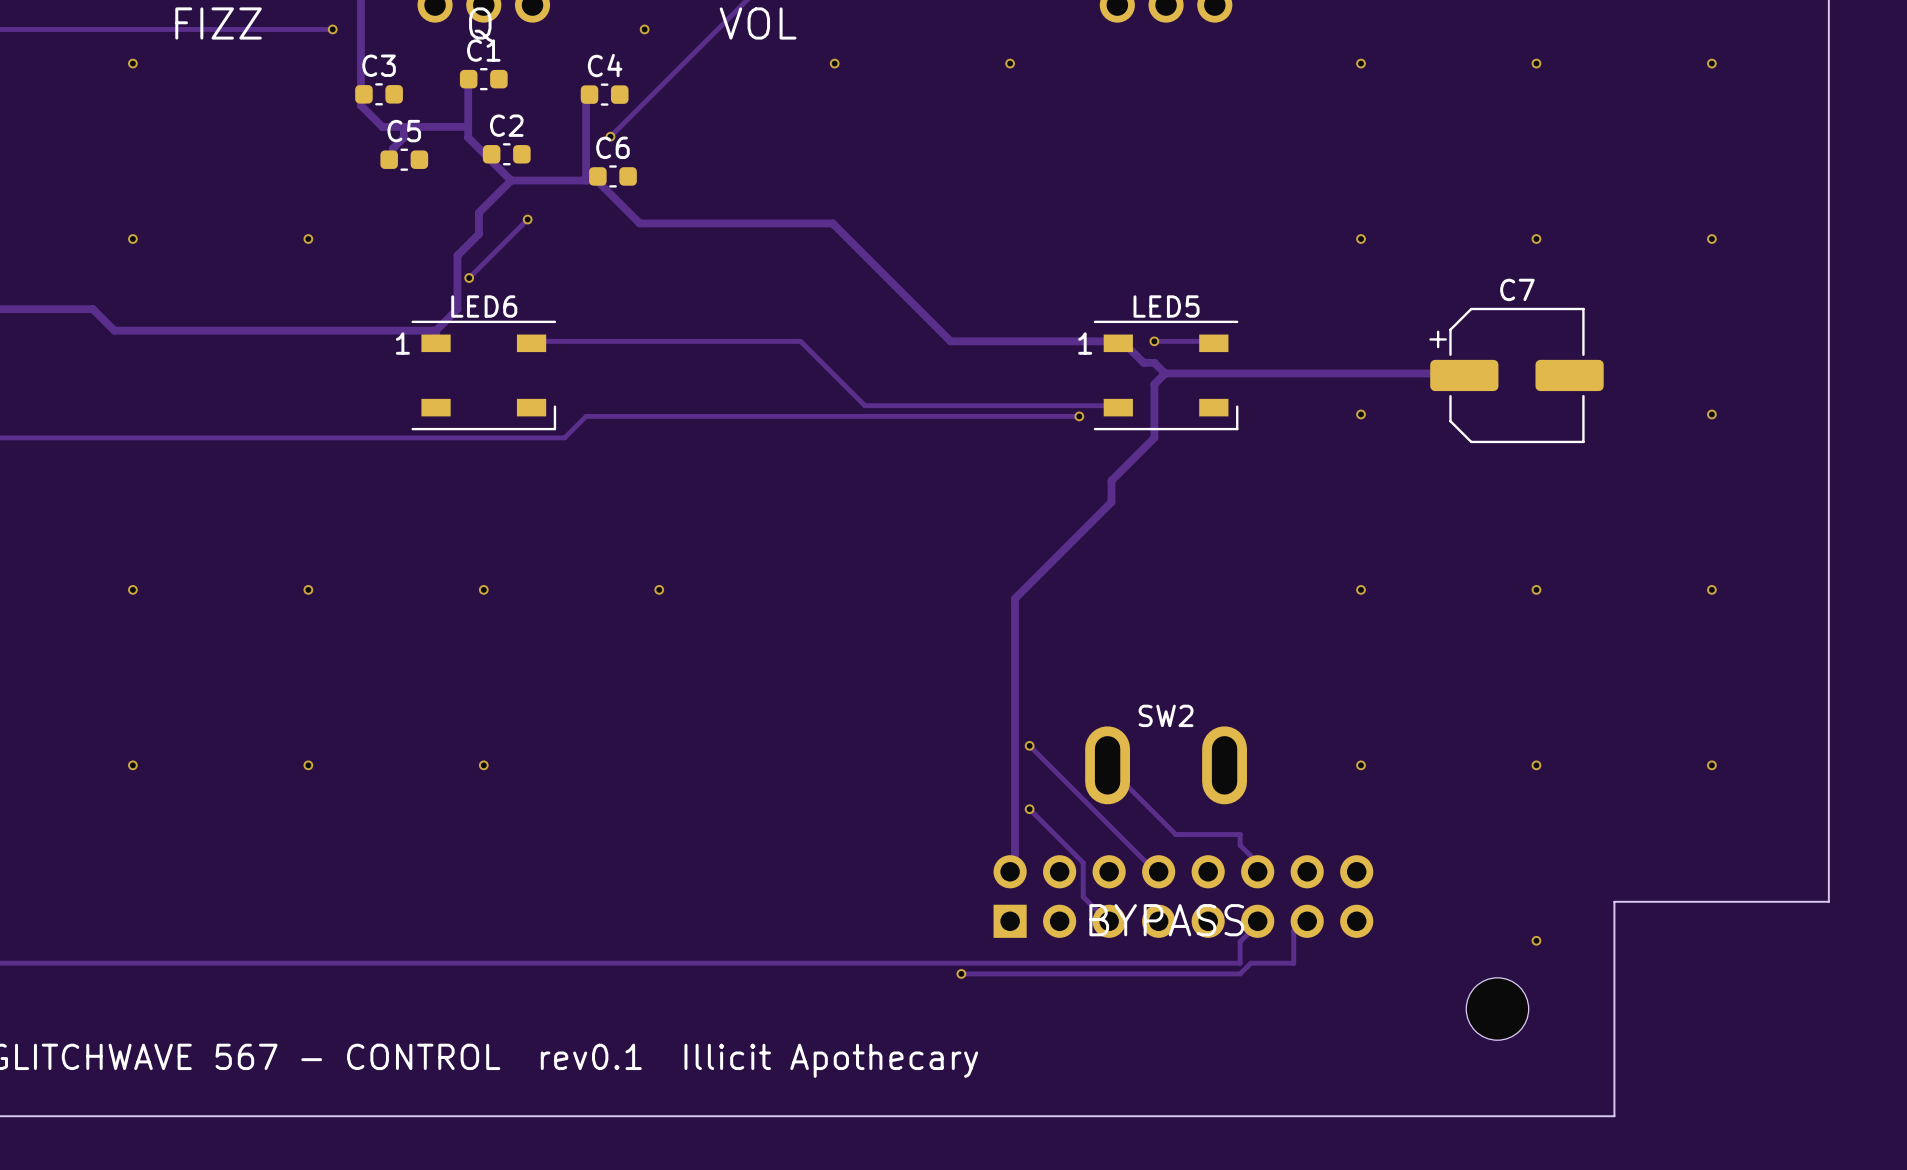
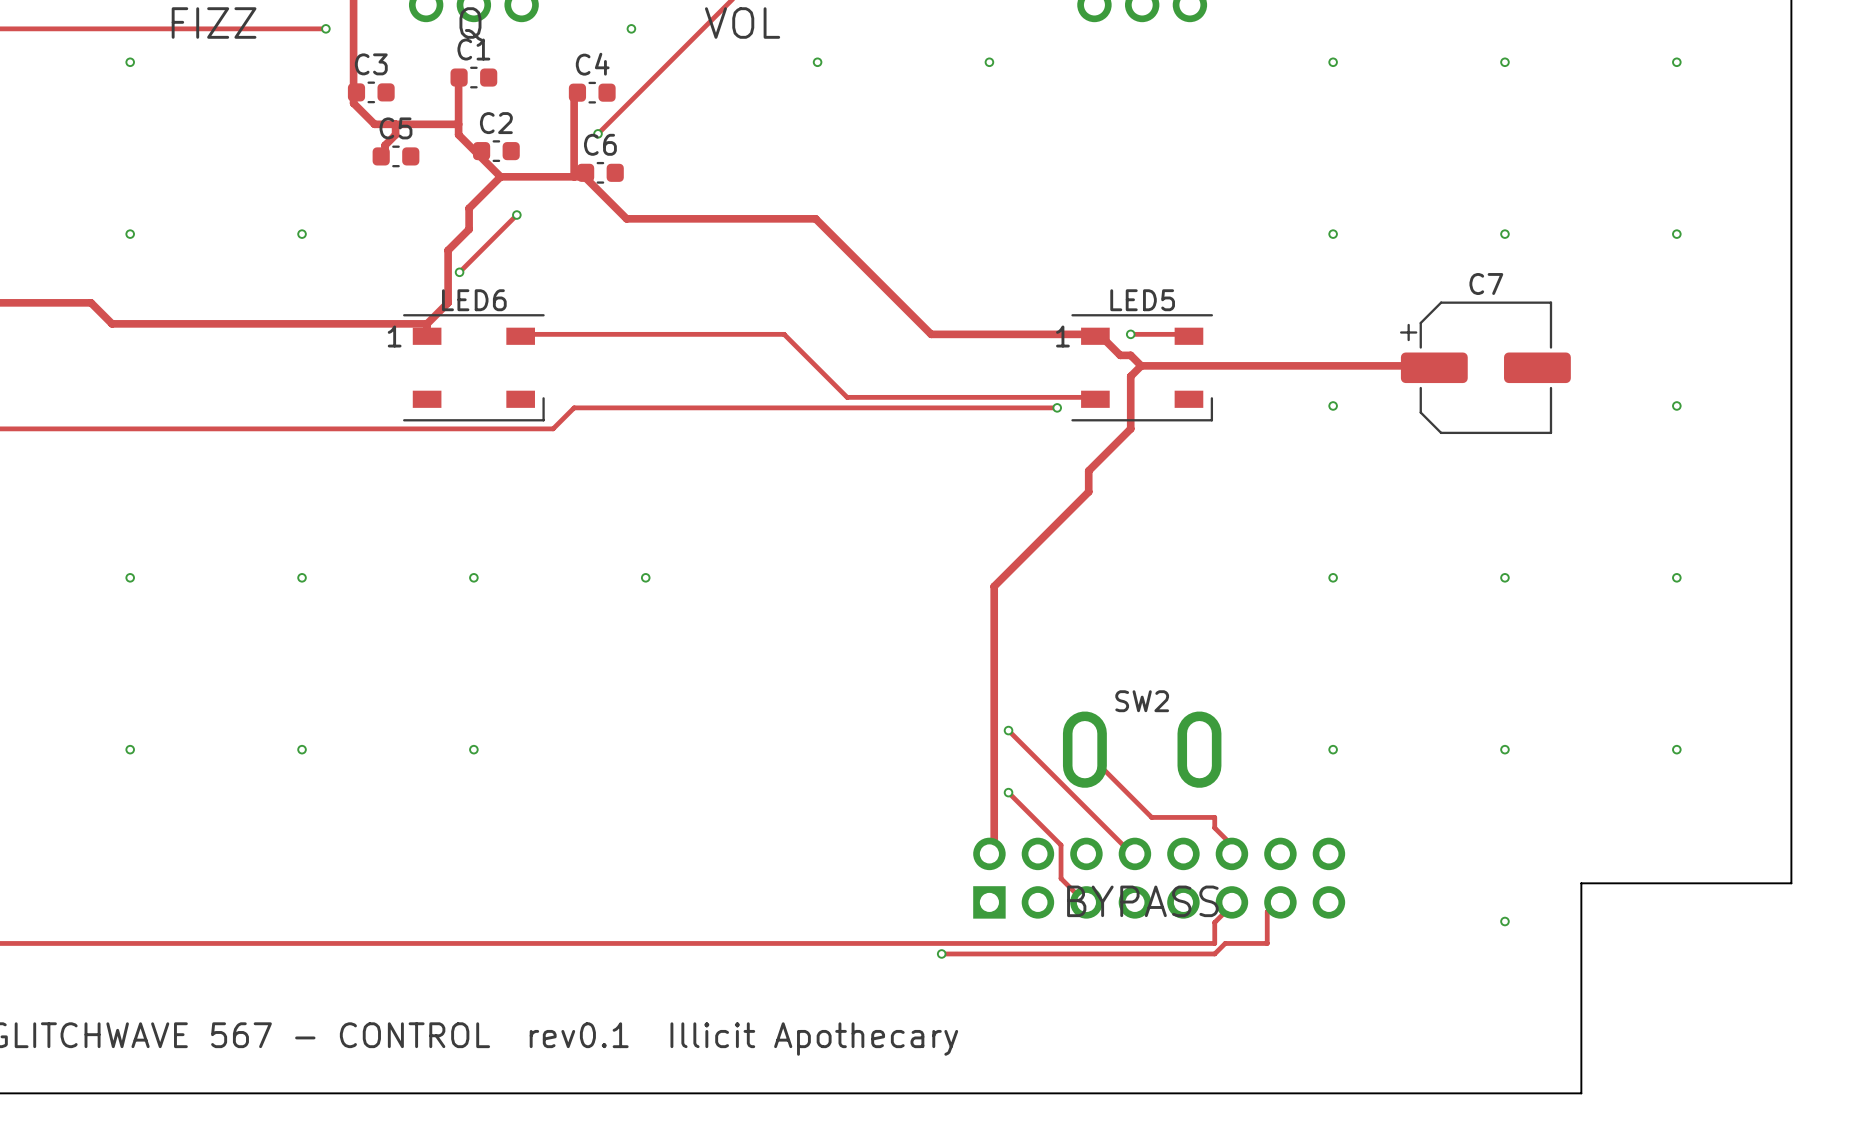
part: (1497, 1009) -> none

